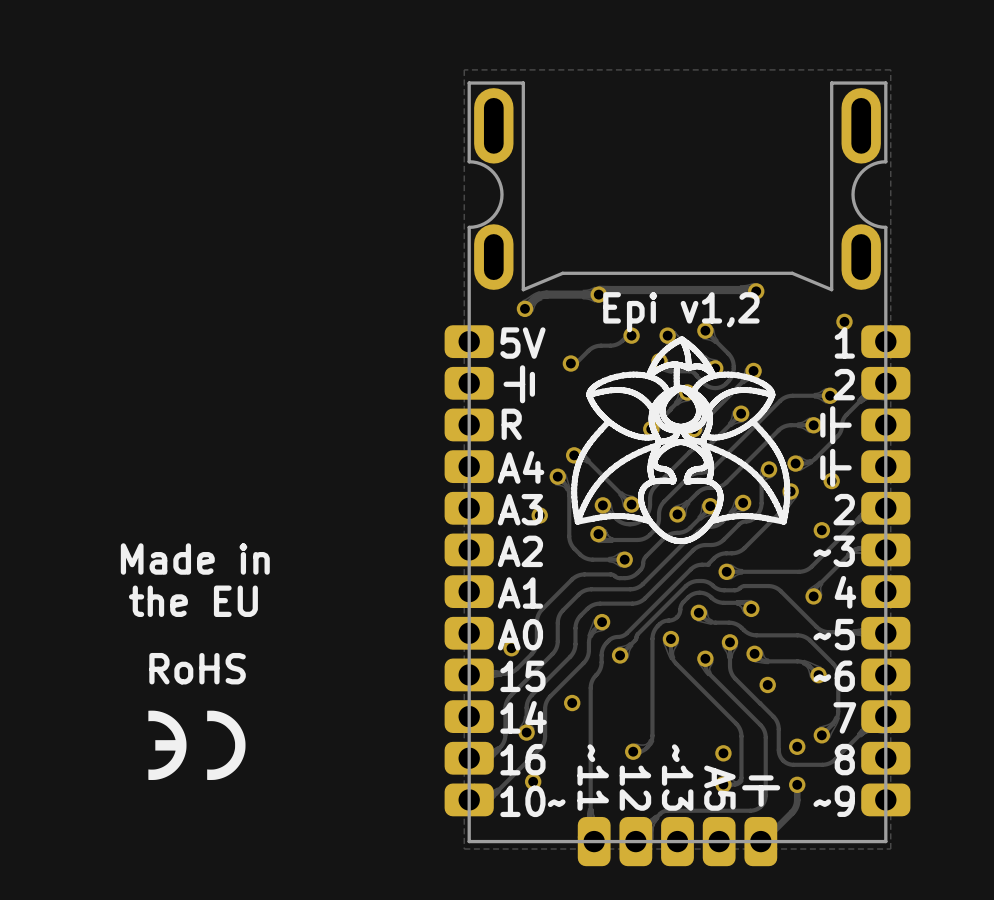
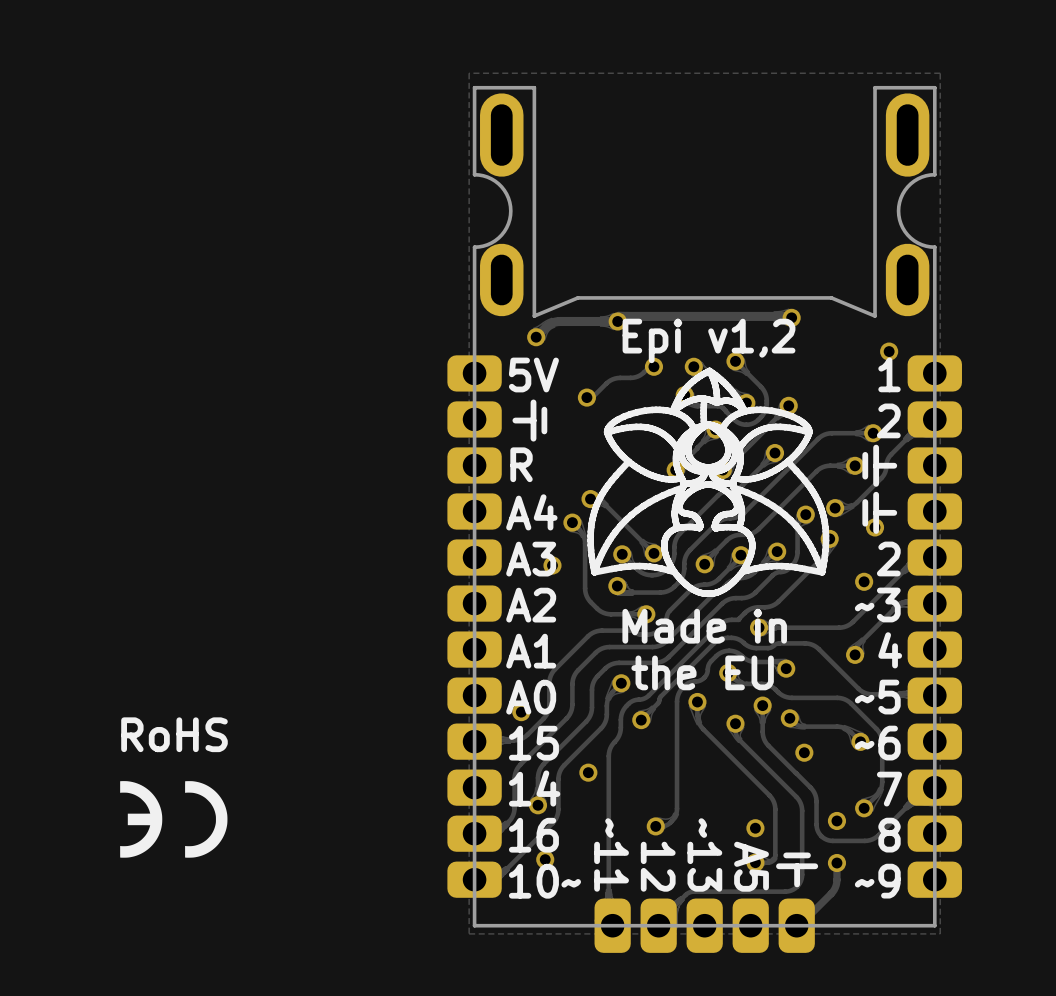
text position: Made in (195, 559) -> Made in (704, 626)
text position: the EU (193, 601) -> the EU (702, 672)

